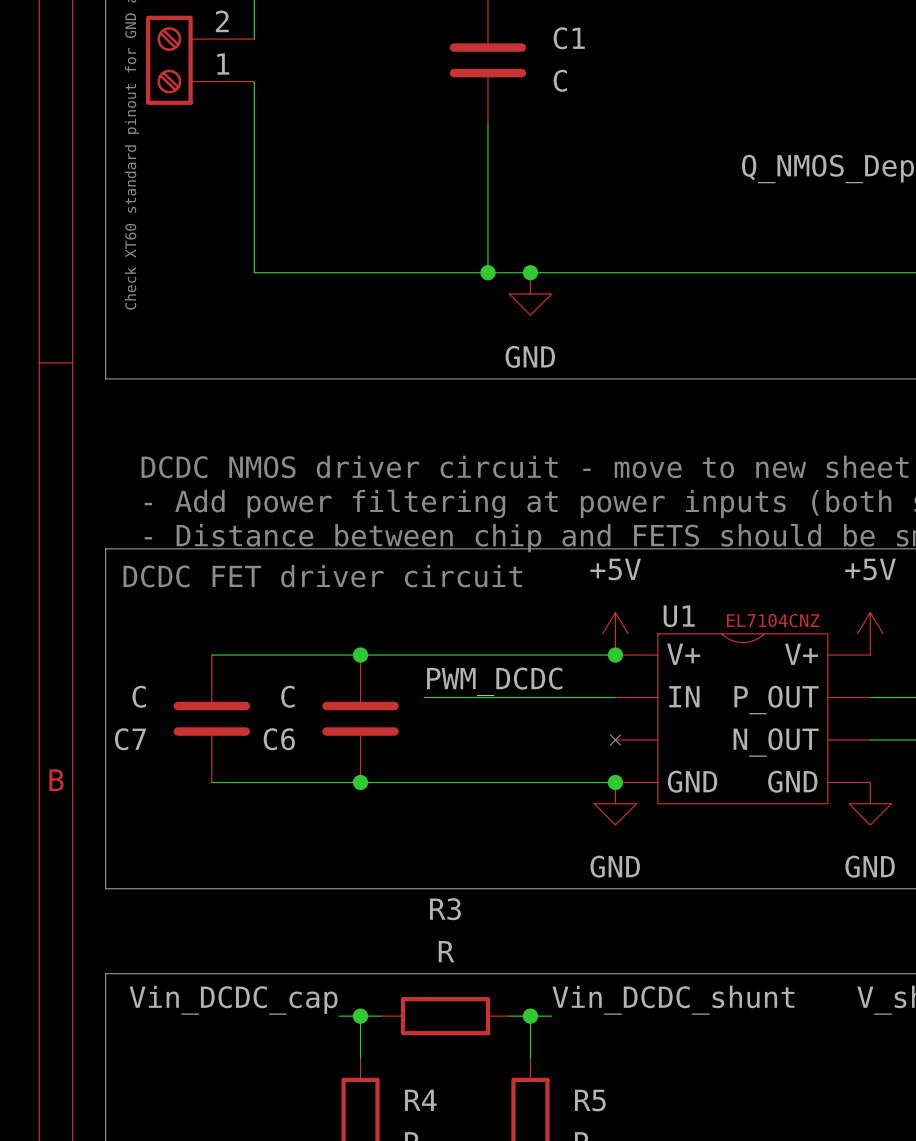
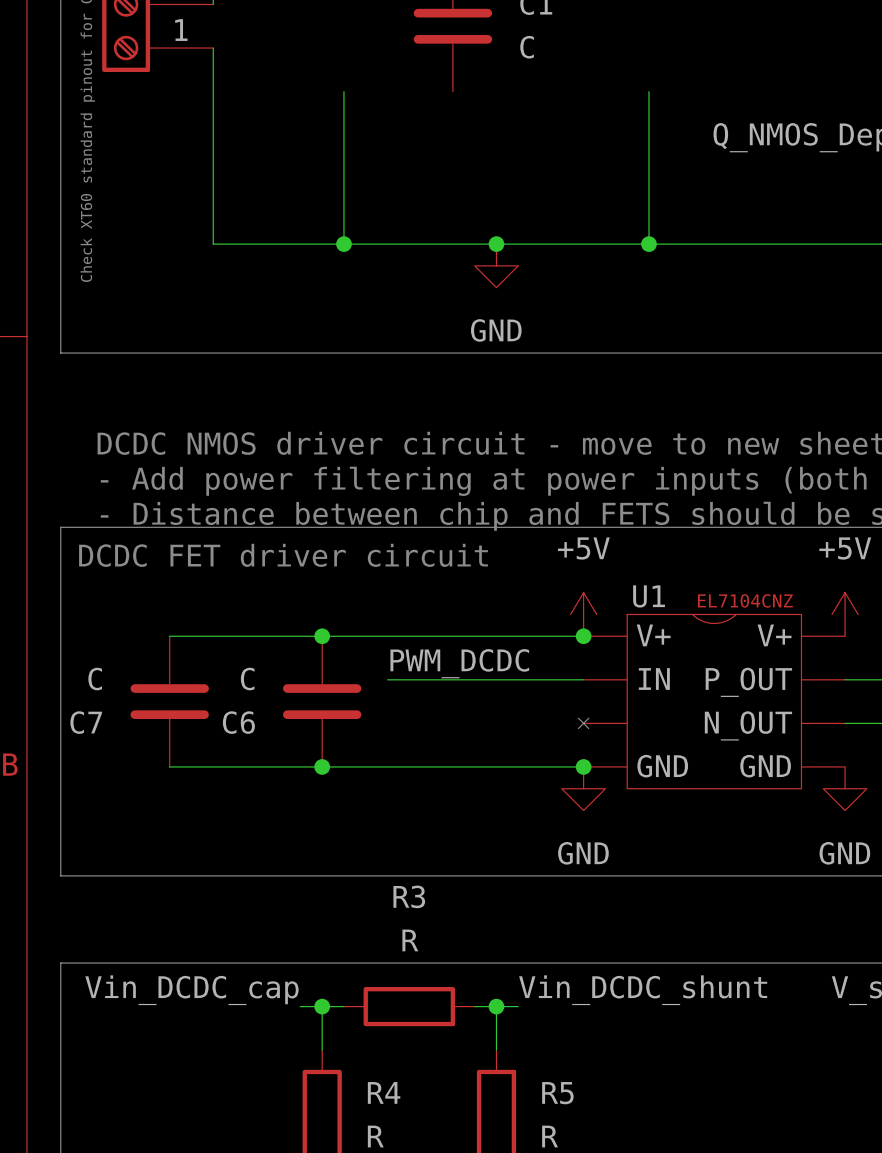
wire: (487, 124) (487, 272) -> (343, 91) (343, 244)
wire: none -> (648, 91) (648, 244)
junction: none -> (343, 244)
junction: (487, 272) -> none
junction: none -> (648, 244)

